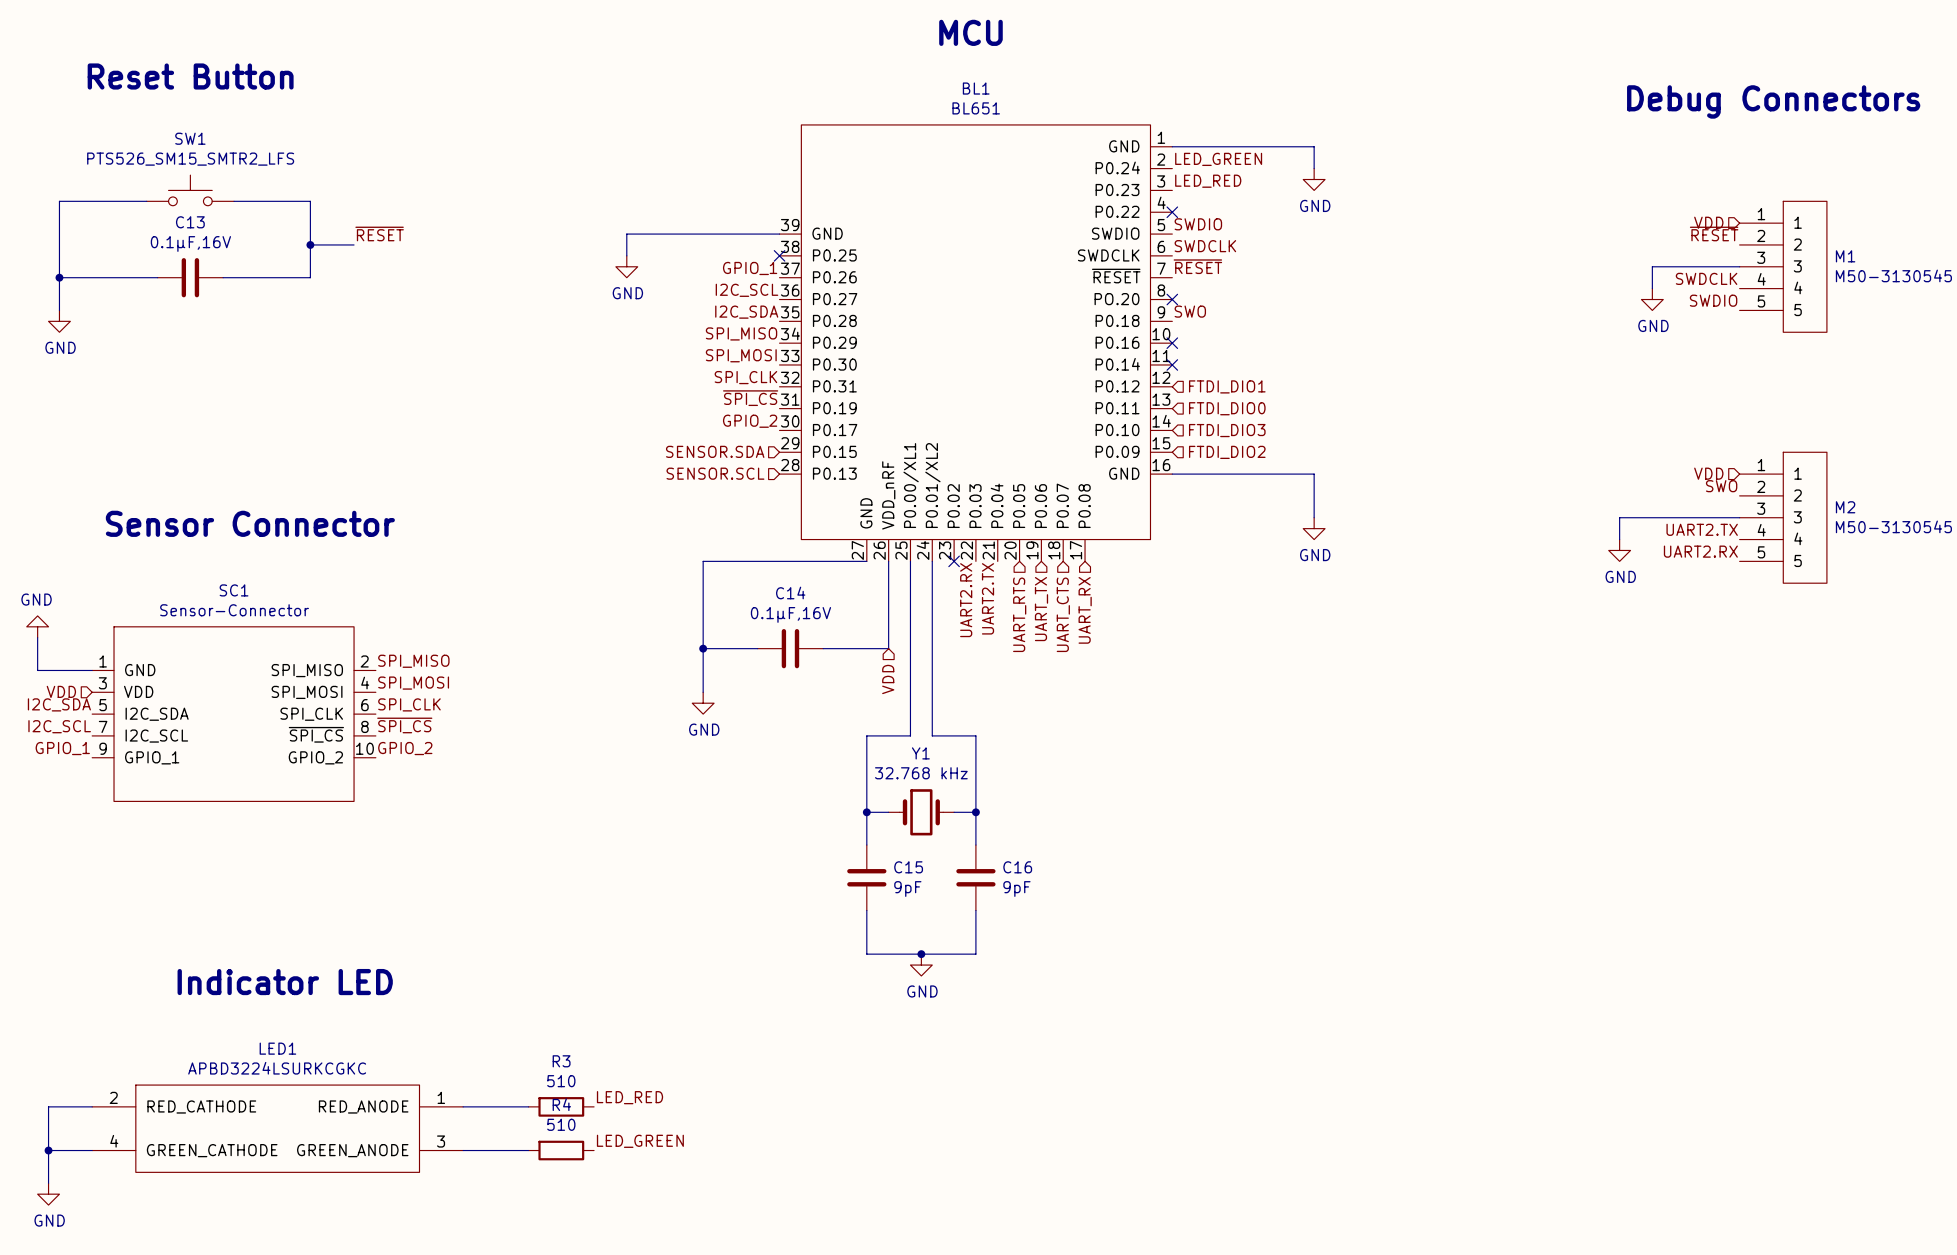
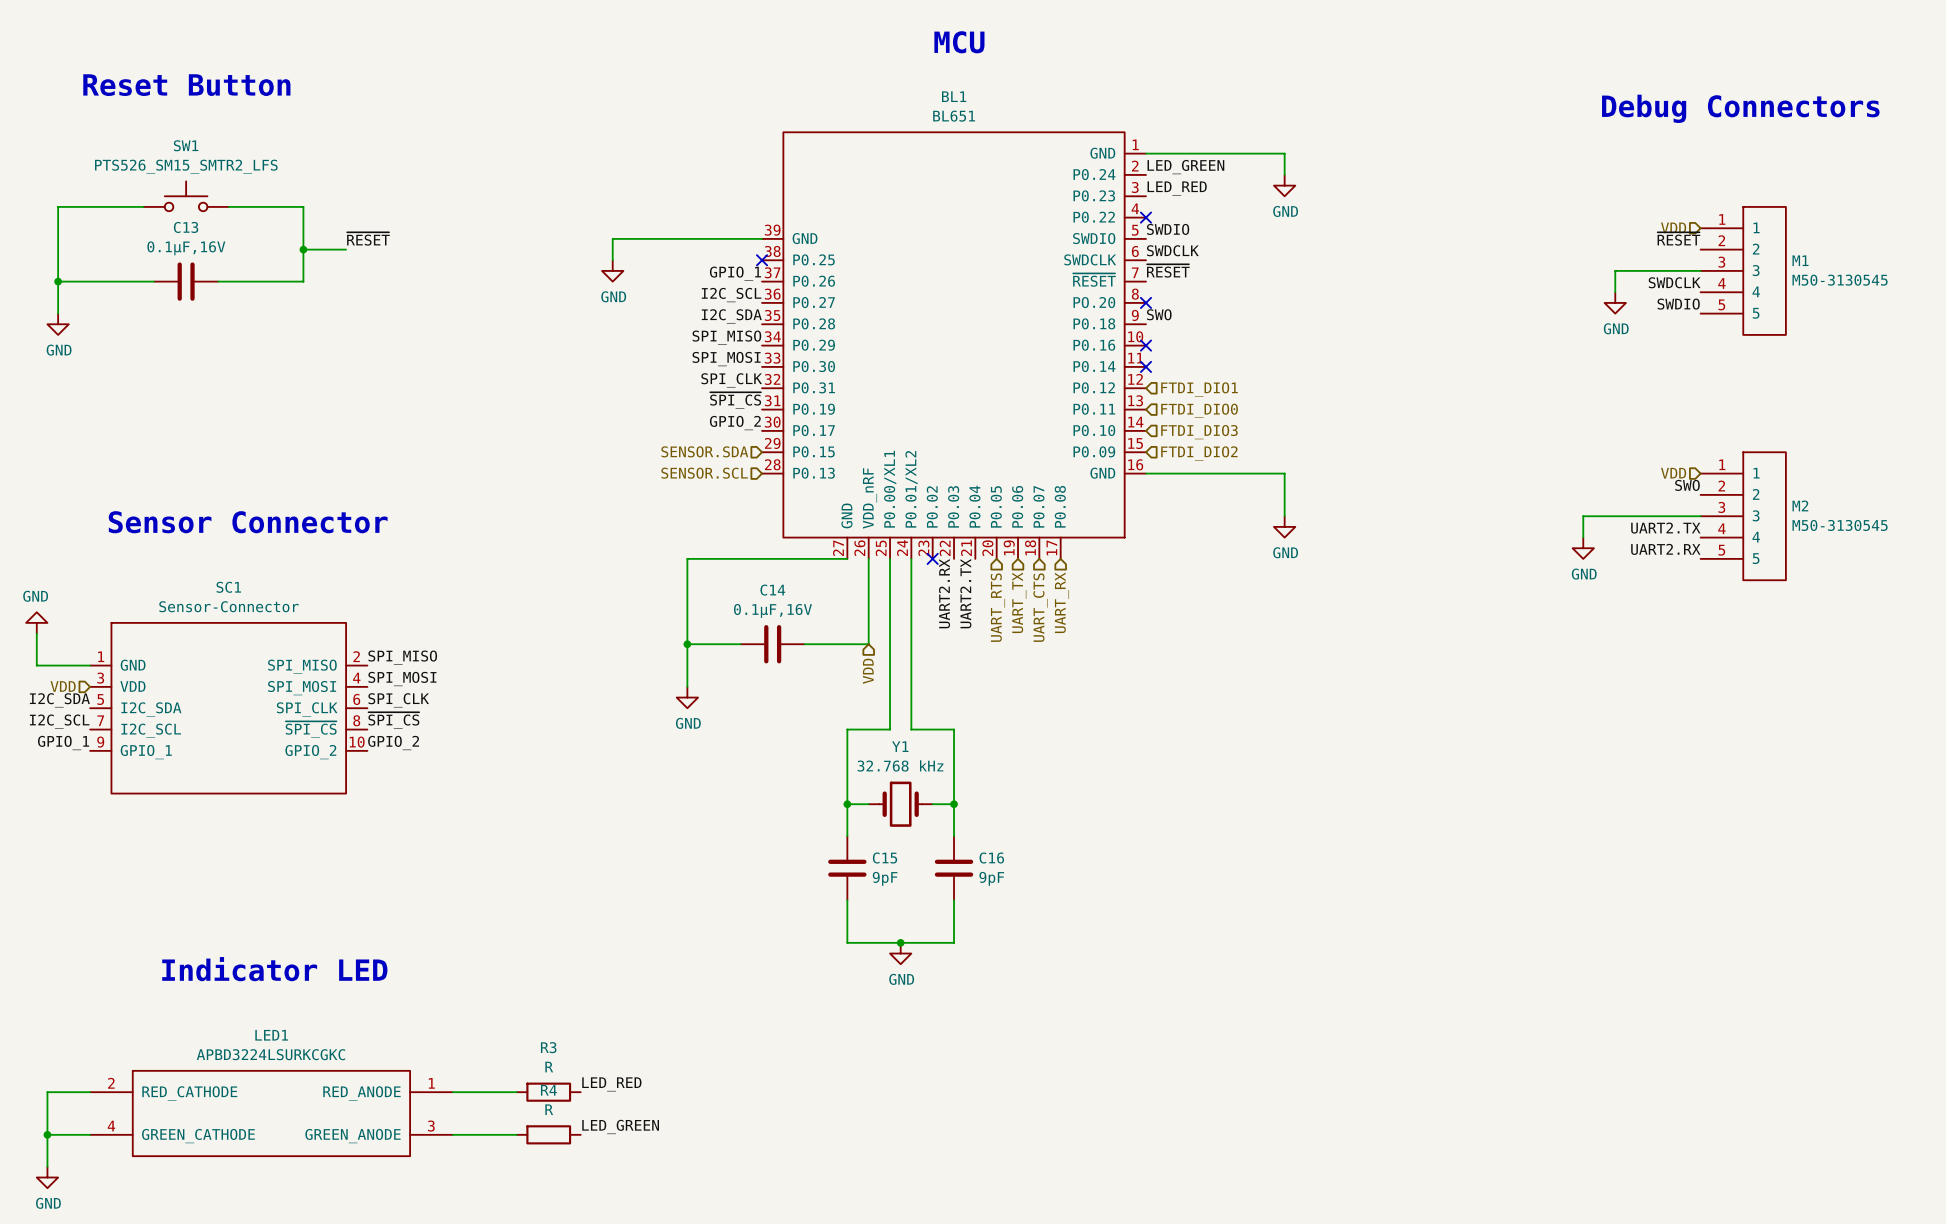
R3 value: 510 (561, 1081) -> R (549, 1067)
R4 value: 510 (561, 1124) -> R (549, 1109)

